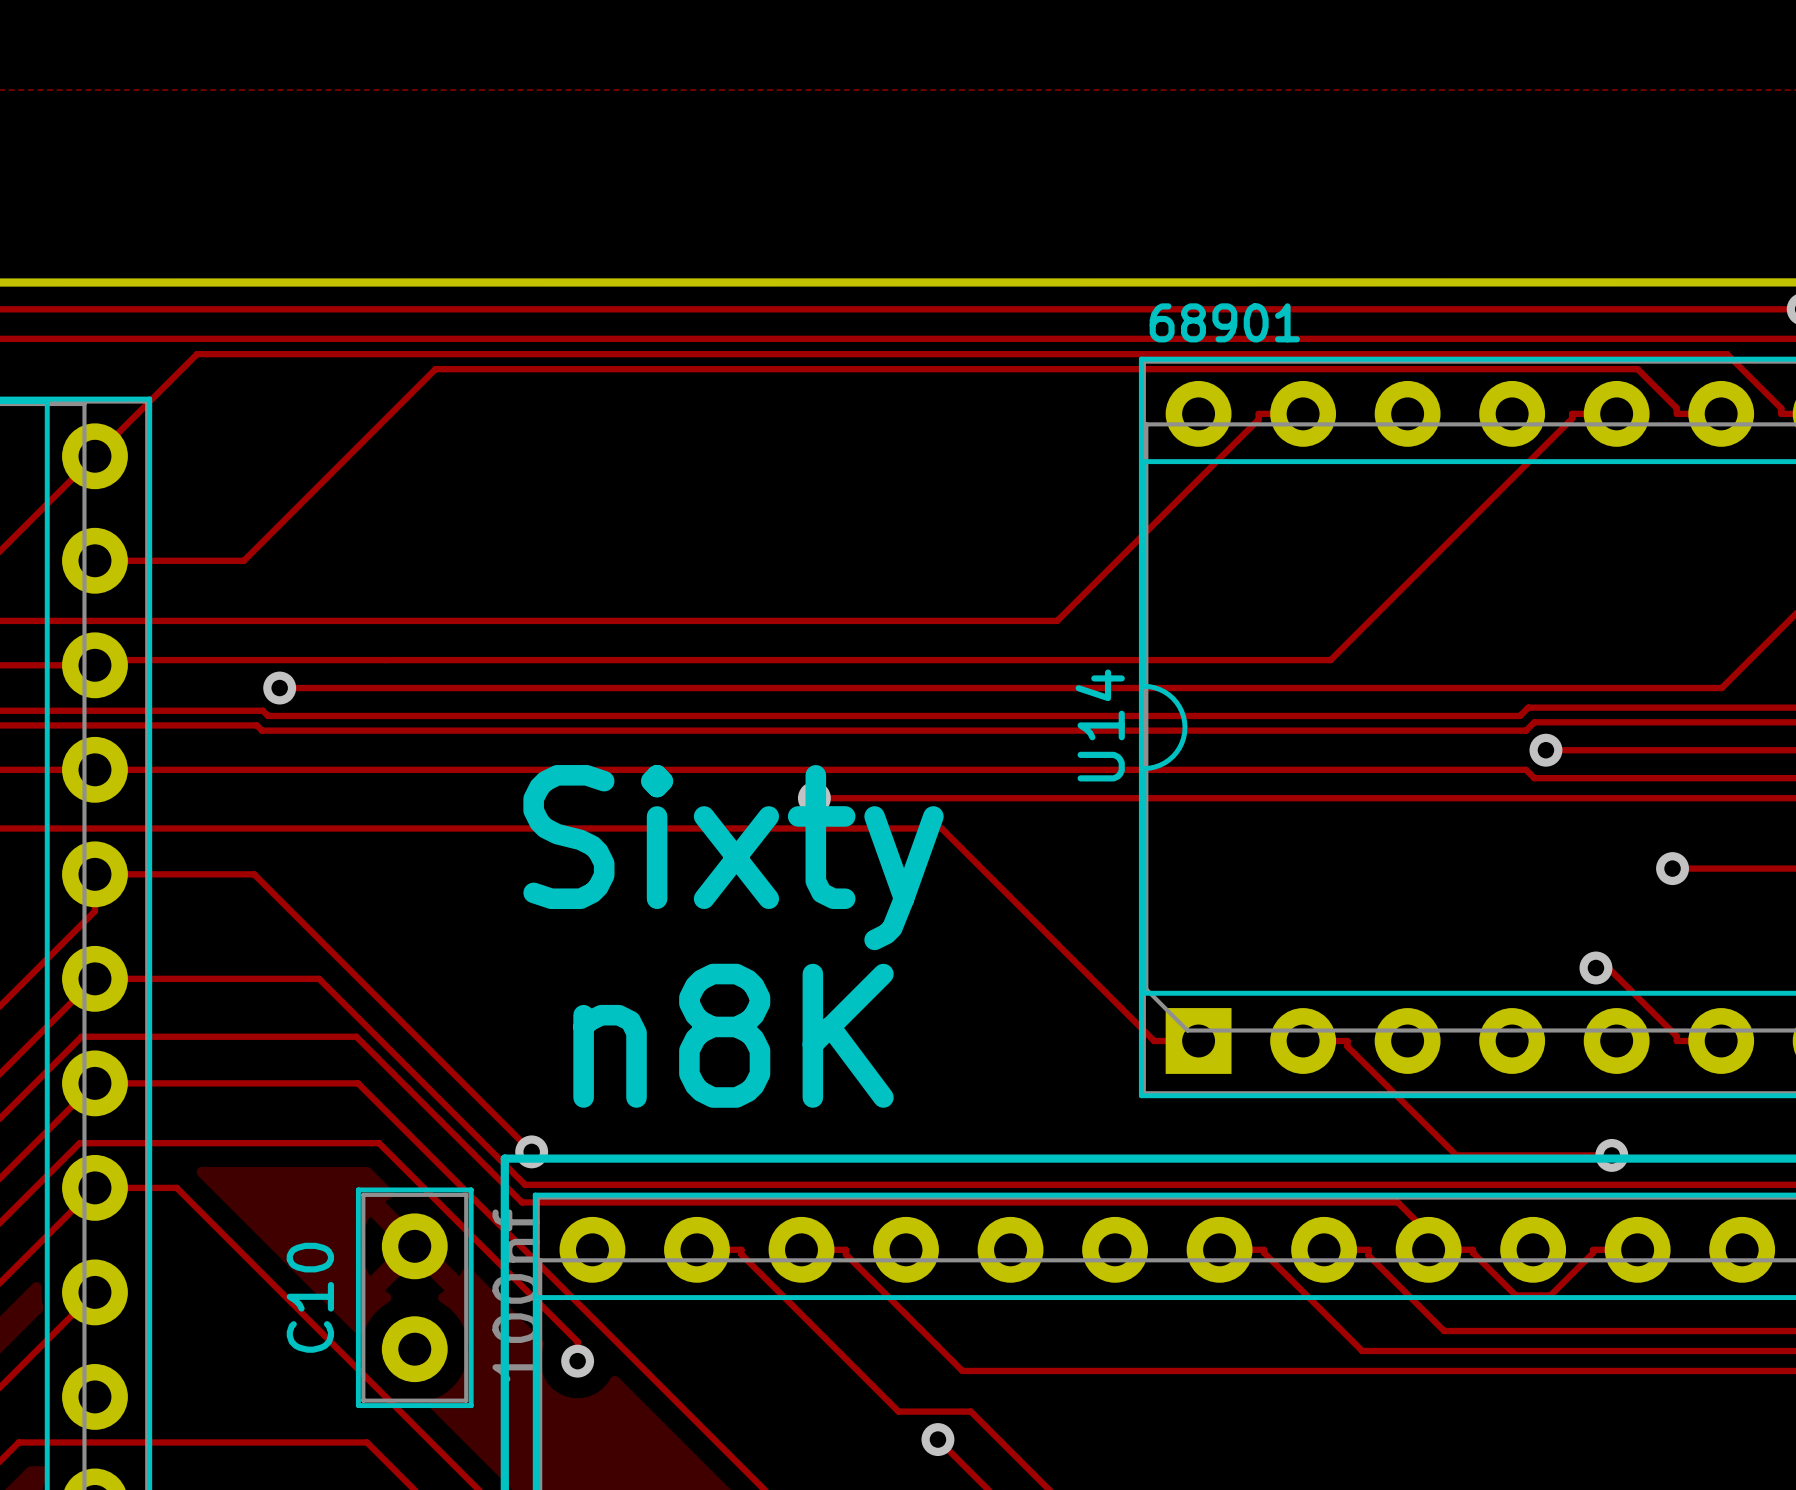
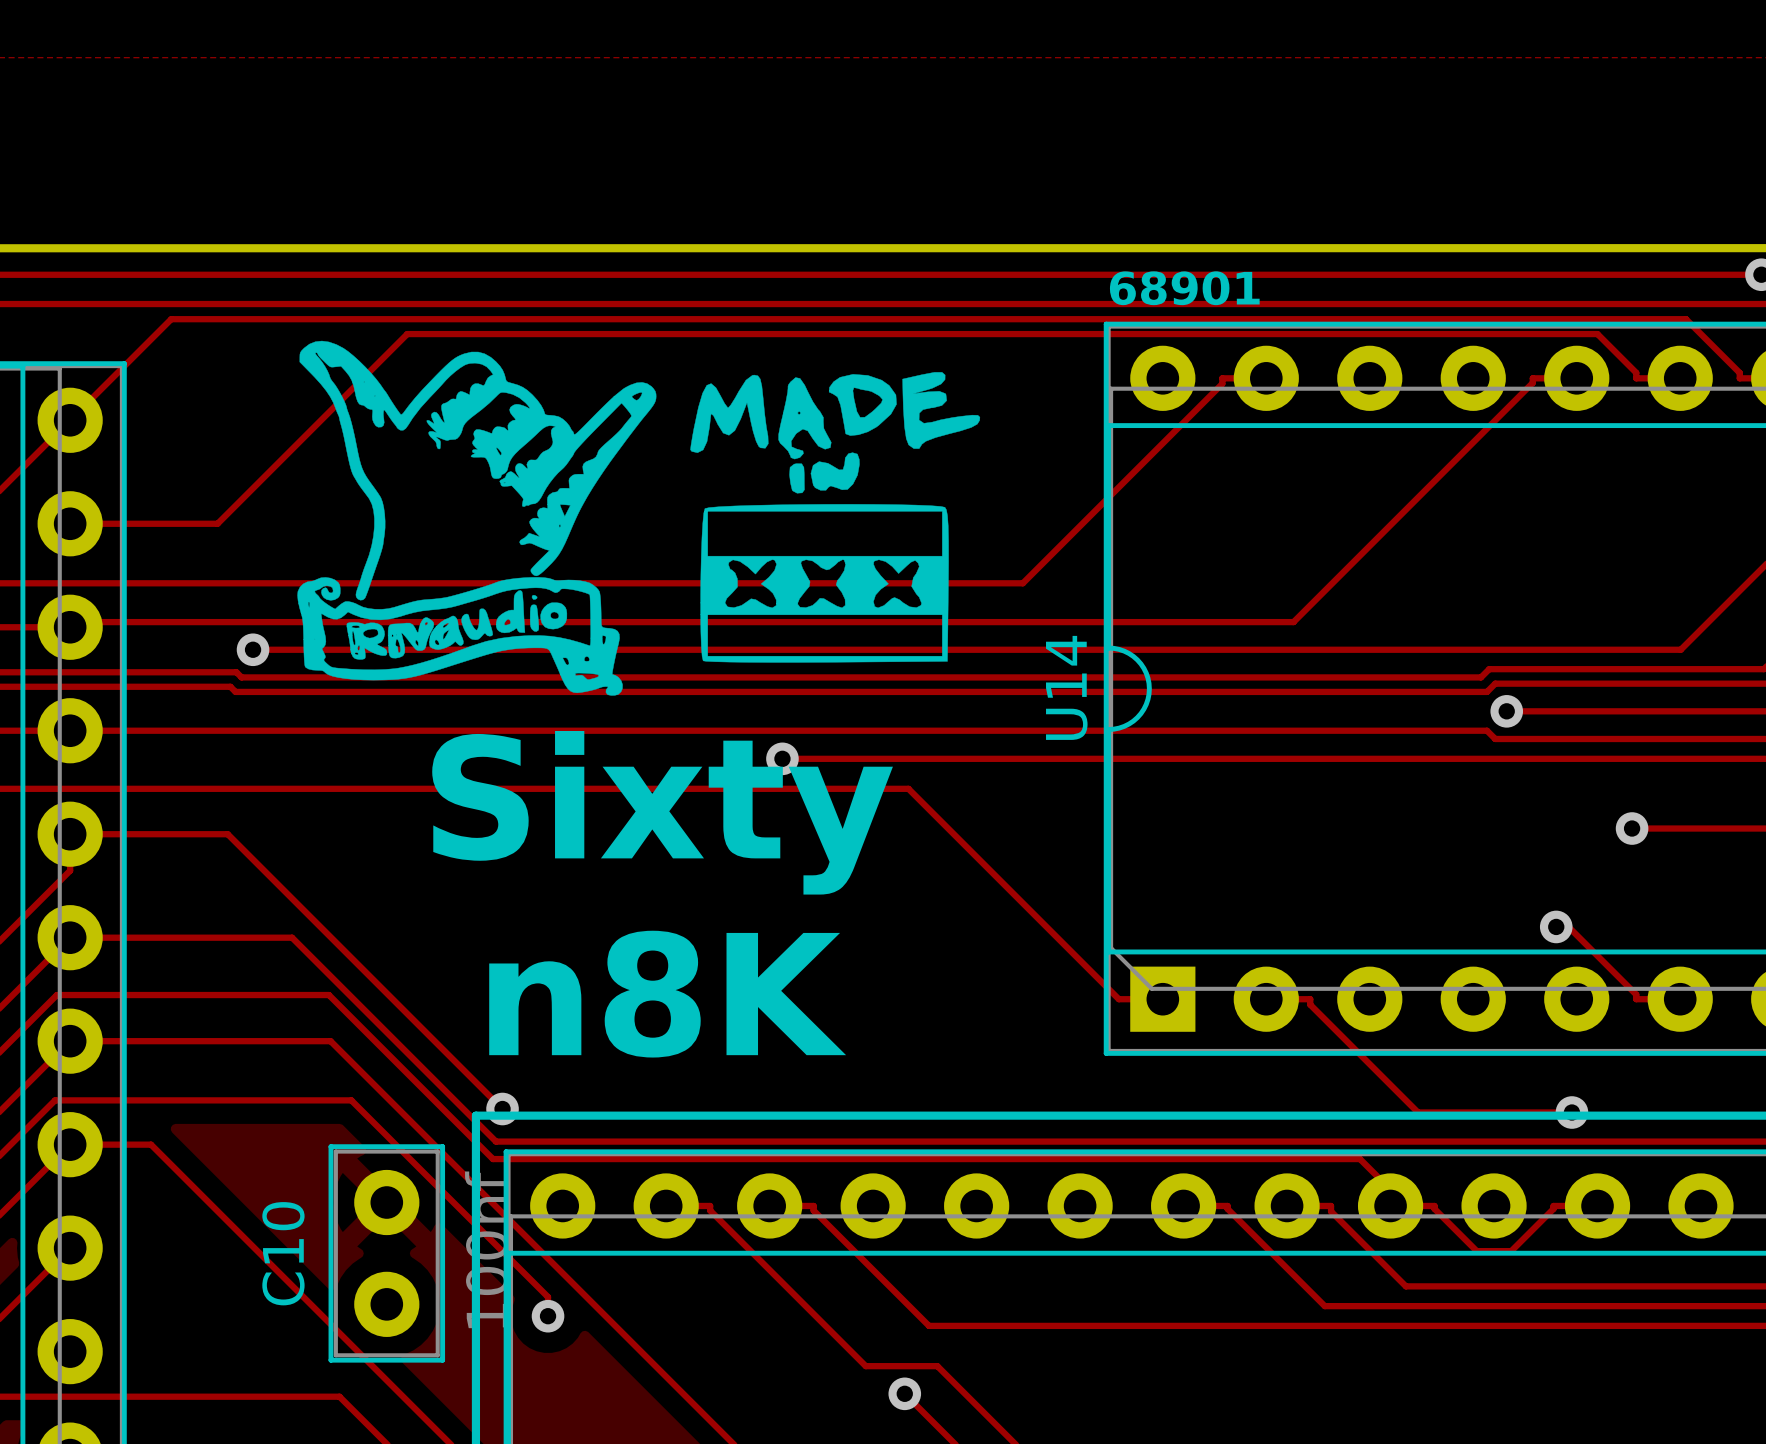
drawing: none -> [297, 340, 981, 696]
text position: Sixty (733, 857) -> Sixty (662, 812)
text position: n8K (733, 1035) -> n8K (667, 994)

